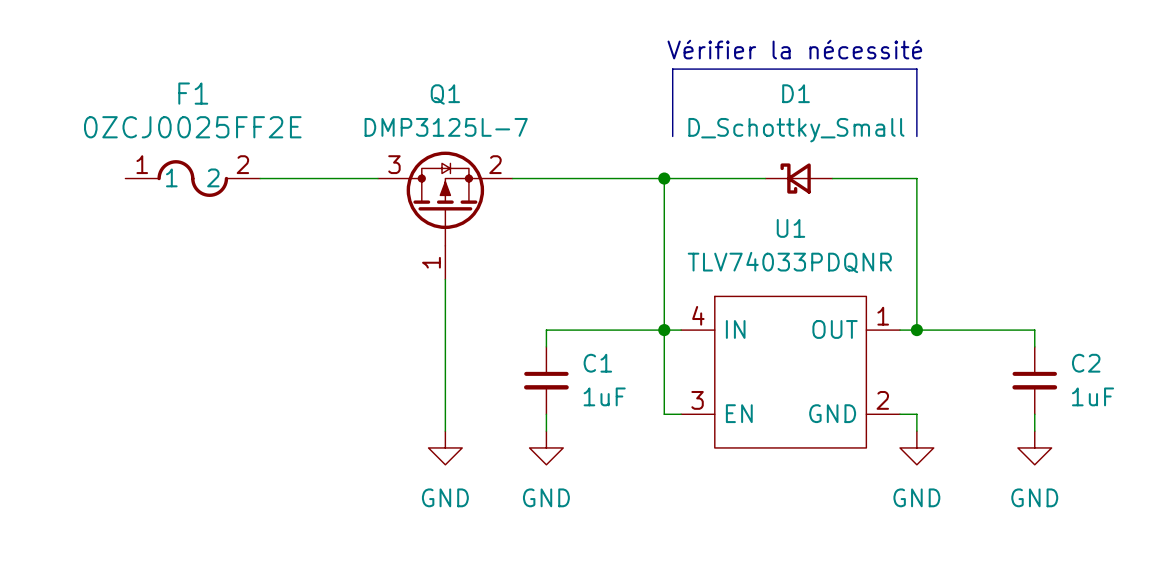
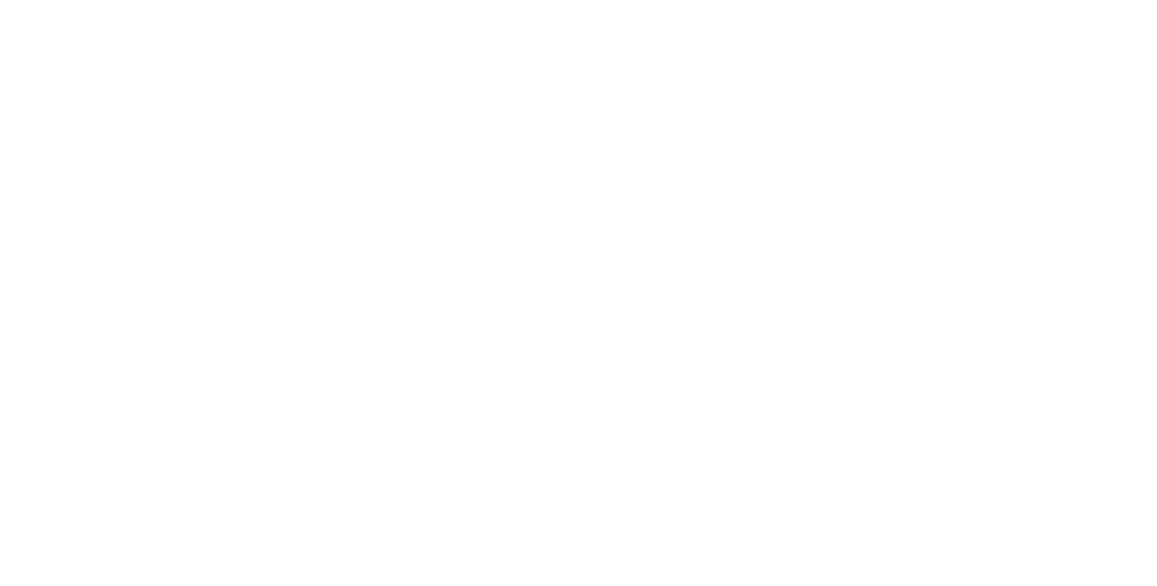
text: Vérifier la nécessité (794, 49) -> none
line: (672, 136) (672, 69) (916, 69) (916, 136) -> none
F1: 0ZCJ0025FF2E (192, 178) -> none
wire: (260, 178) (378, 178) -> none
wire: (512, 178) (765, 178) -> none
wire: (664, 178) (664, 414) (681, 414) -> none
junction: (664, 178) -> none
D1: D_Schottky_Small (799, 178) -> none
wire: (832, 178) (916, 178) (916, 330) -> none
Q1: DMP3125L-7 (445, 215) -> none
wire: (445, 279) (445, 431) -> none
junction: (664, 330) -> none
wire: (681, 330) (546, 330) (546, 346) -> none
wire: (900, 330) (1034, 330) (1034, 346) -> none
junction: (916, 330) -> none
U1: TLV74033PDQNR (790, 372) -> none
C1: 1uF (546, 380) -> none
C2: 1uF (1034, 380) -> none
wire: (546, 414) (546, 431) -> none
wire: (900, 414) (916, 414) (916, 431) -> none
wire: (1034, 414) (1034, 431) -> none
power symbol: GND (445, 447) -> none
power symbol: GND (546, 447) -> none
power symbol: GND (916, 447) -> none
power symbol: GND (1034, 447) -> none

